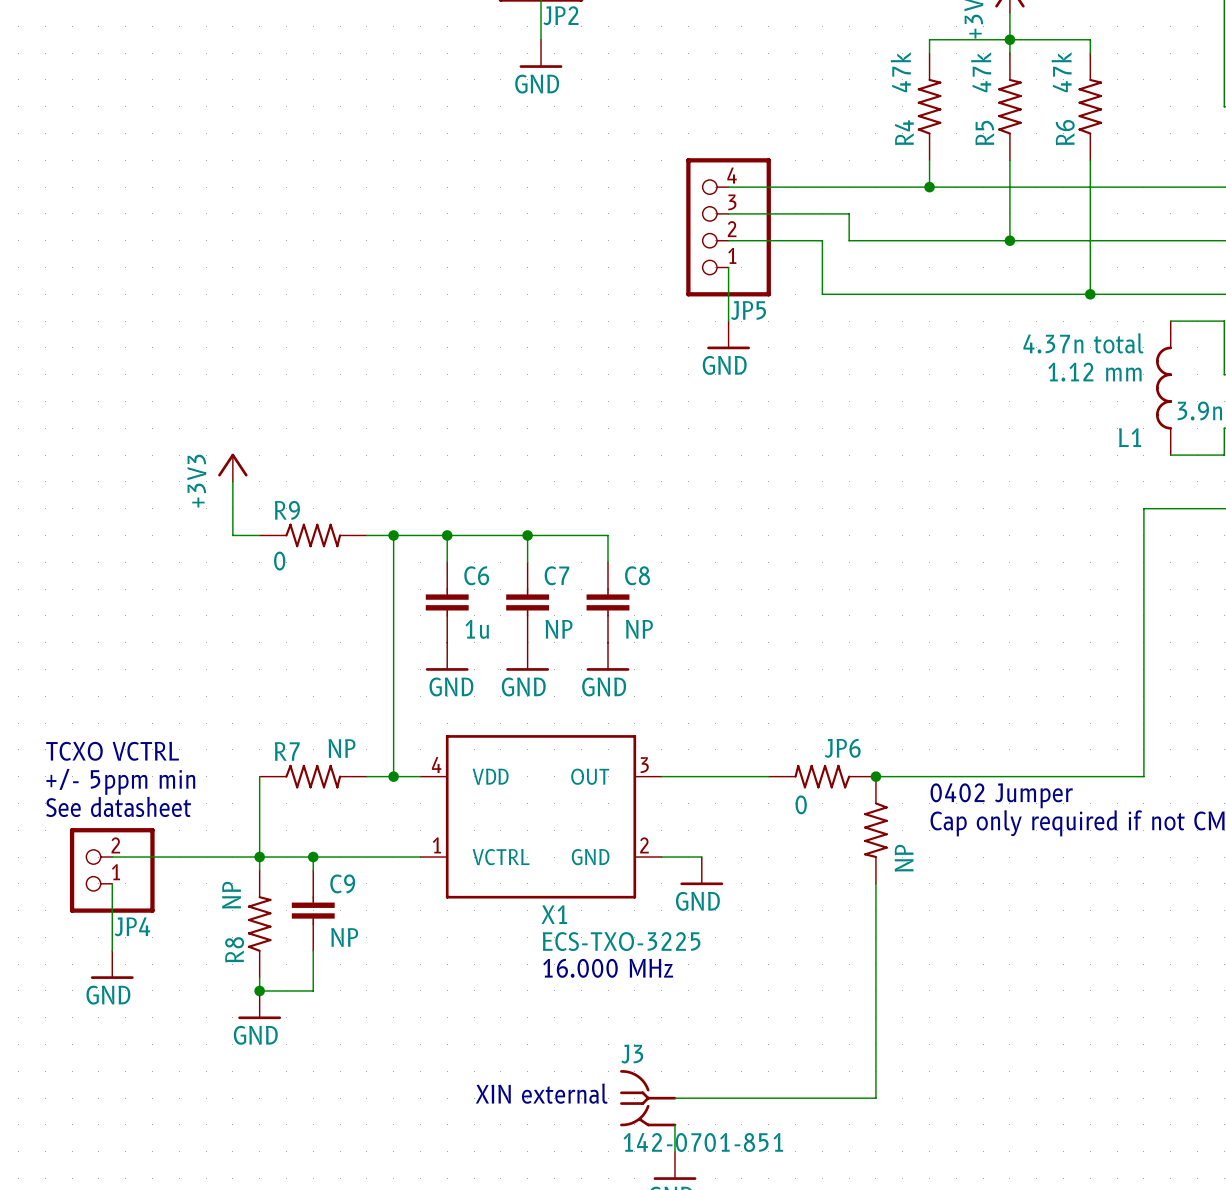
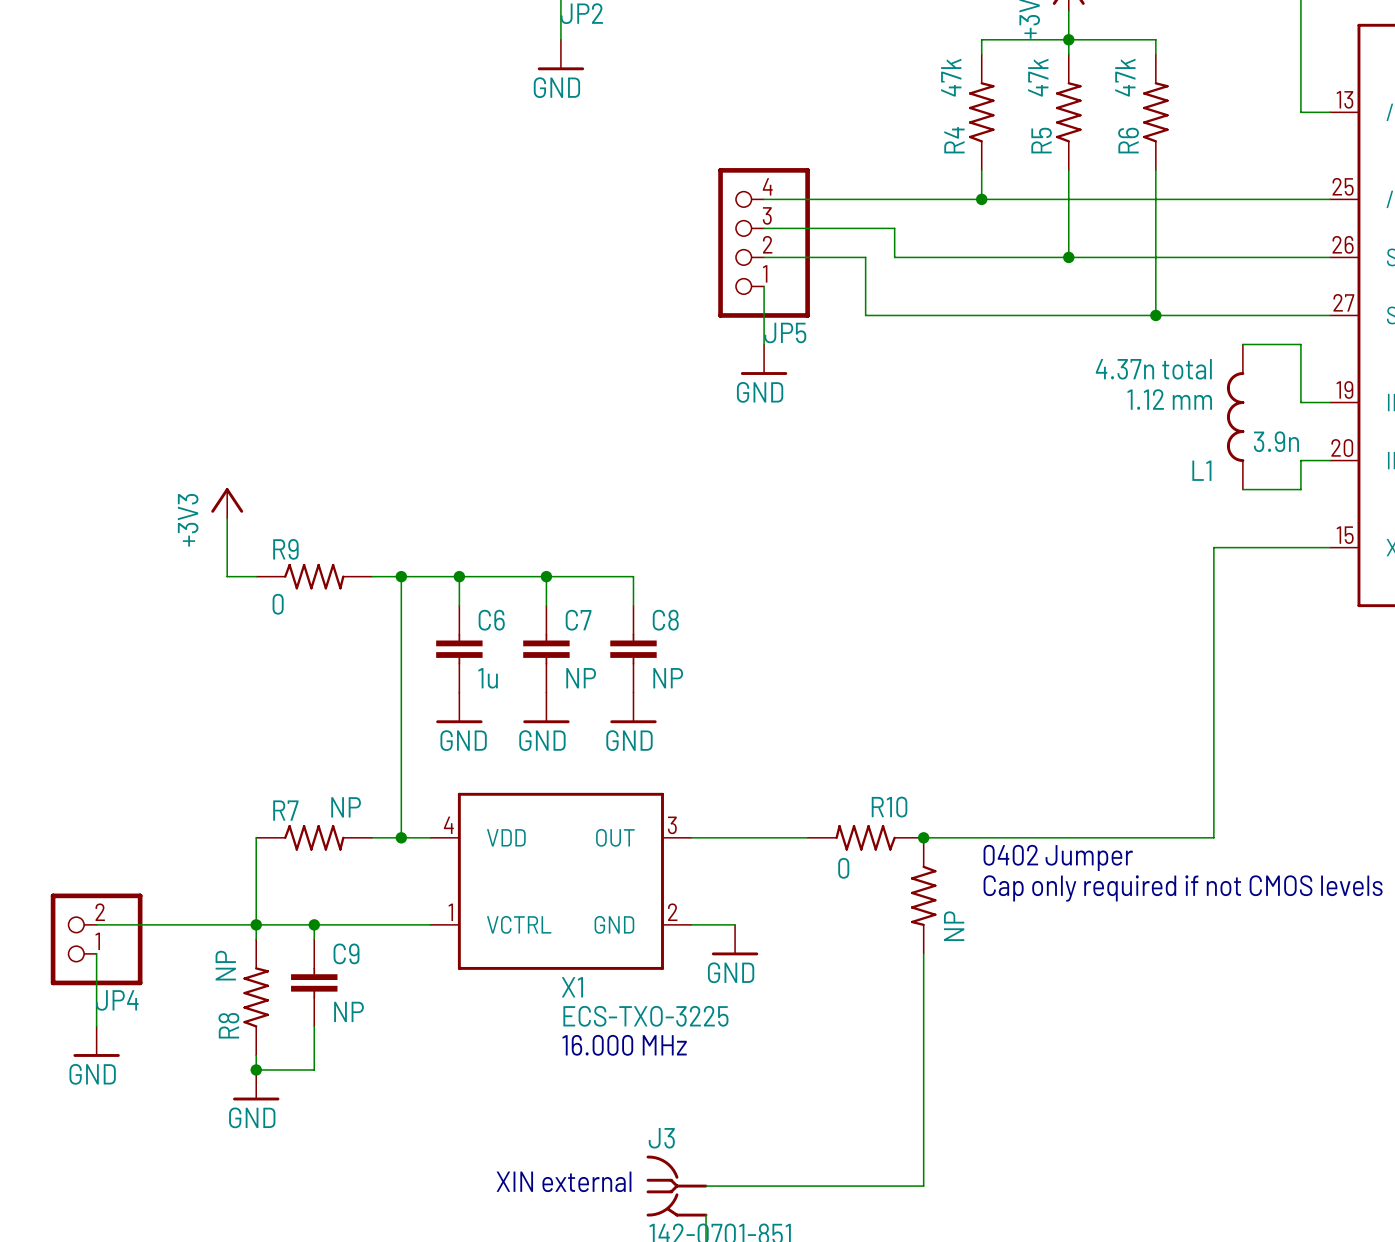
JP6 name: JP6 (842, 748) -> R10 (889, 807)
text: TCXO VCTRL (112, 751) -> none
text: +/- 5ppm min (120, 781) -> none
text: See datasheet (118, 806) -> none

